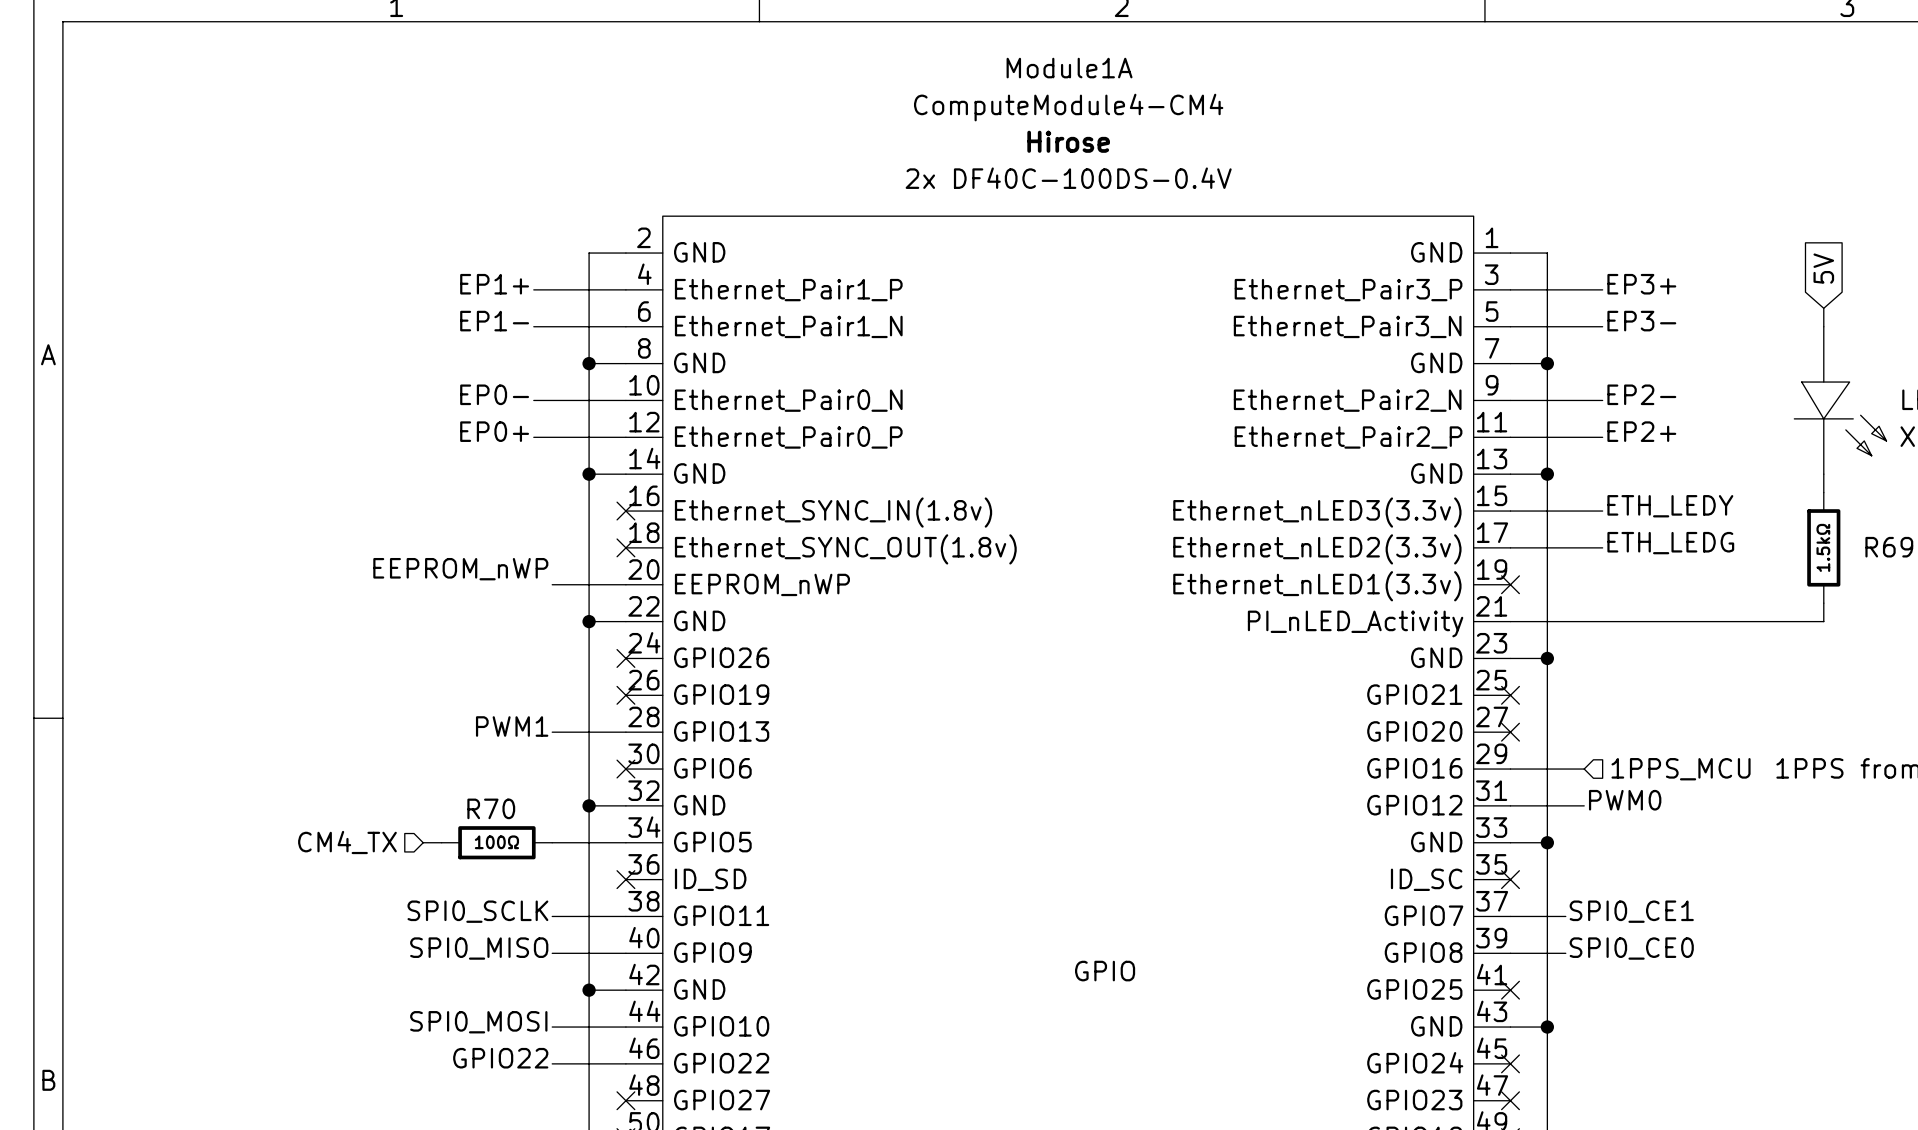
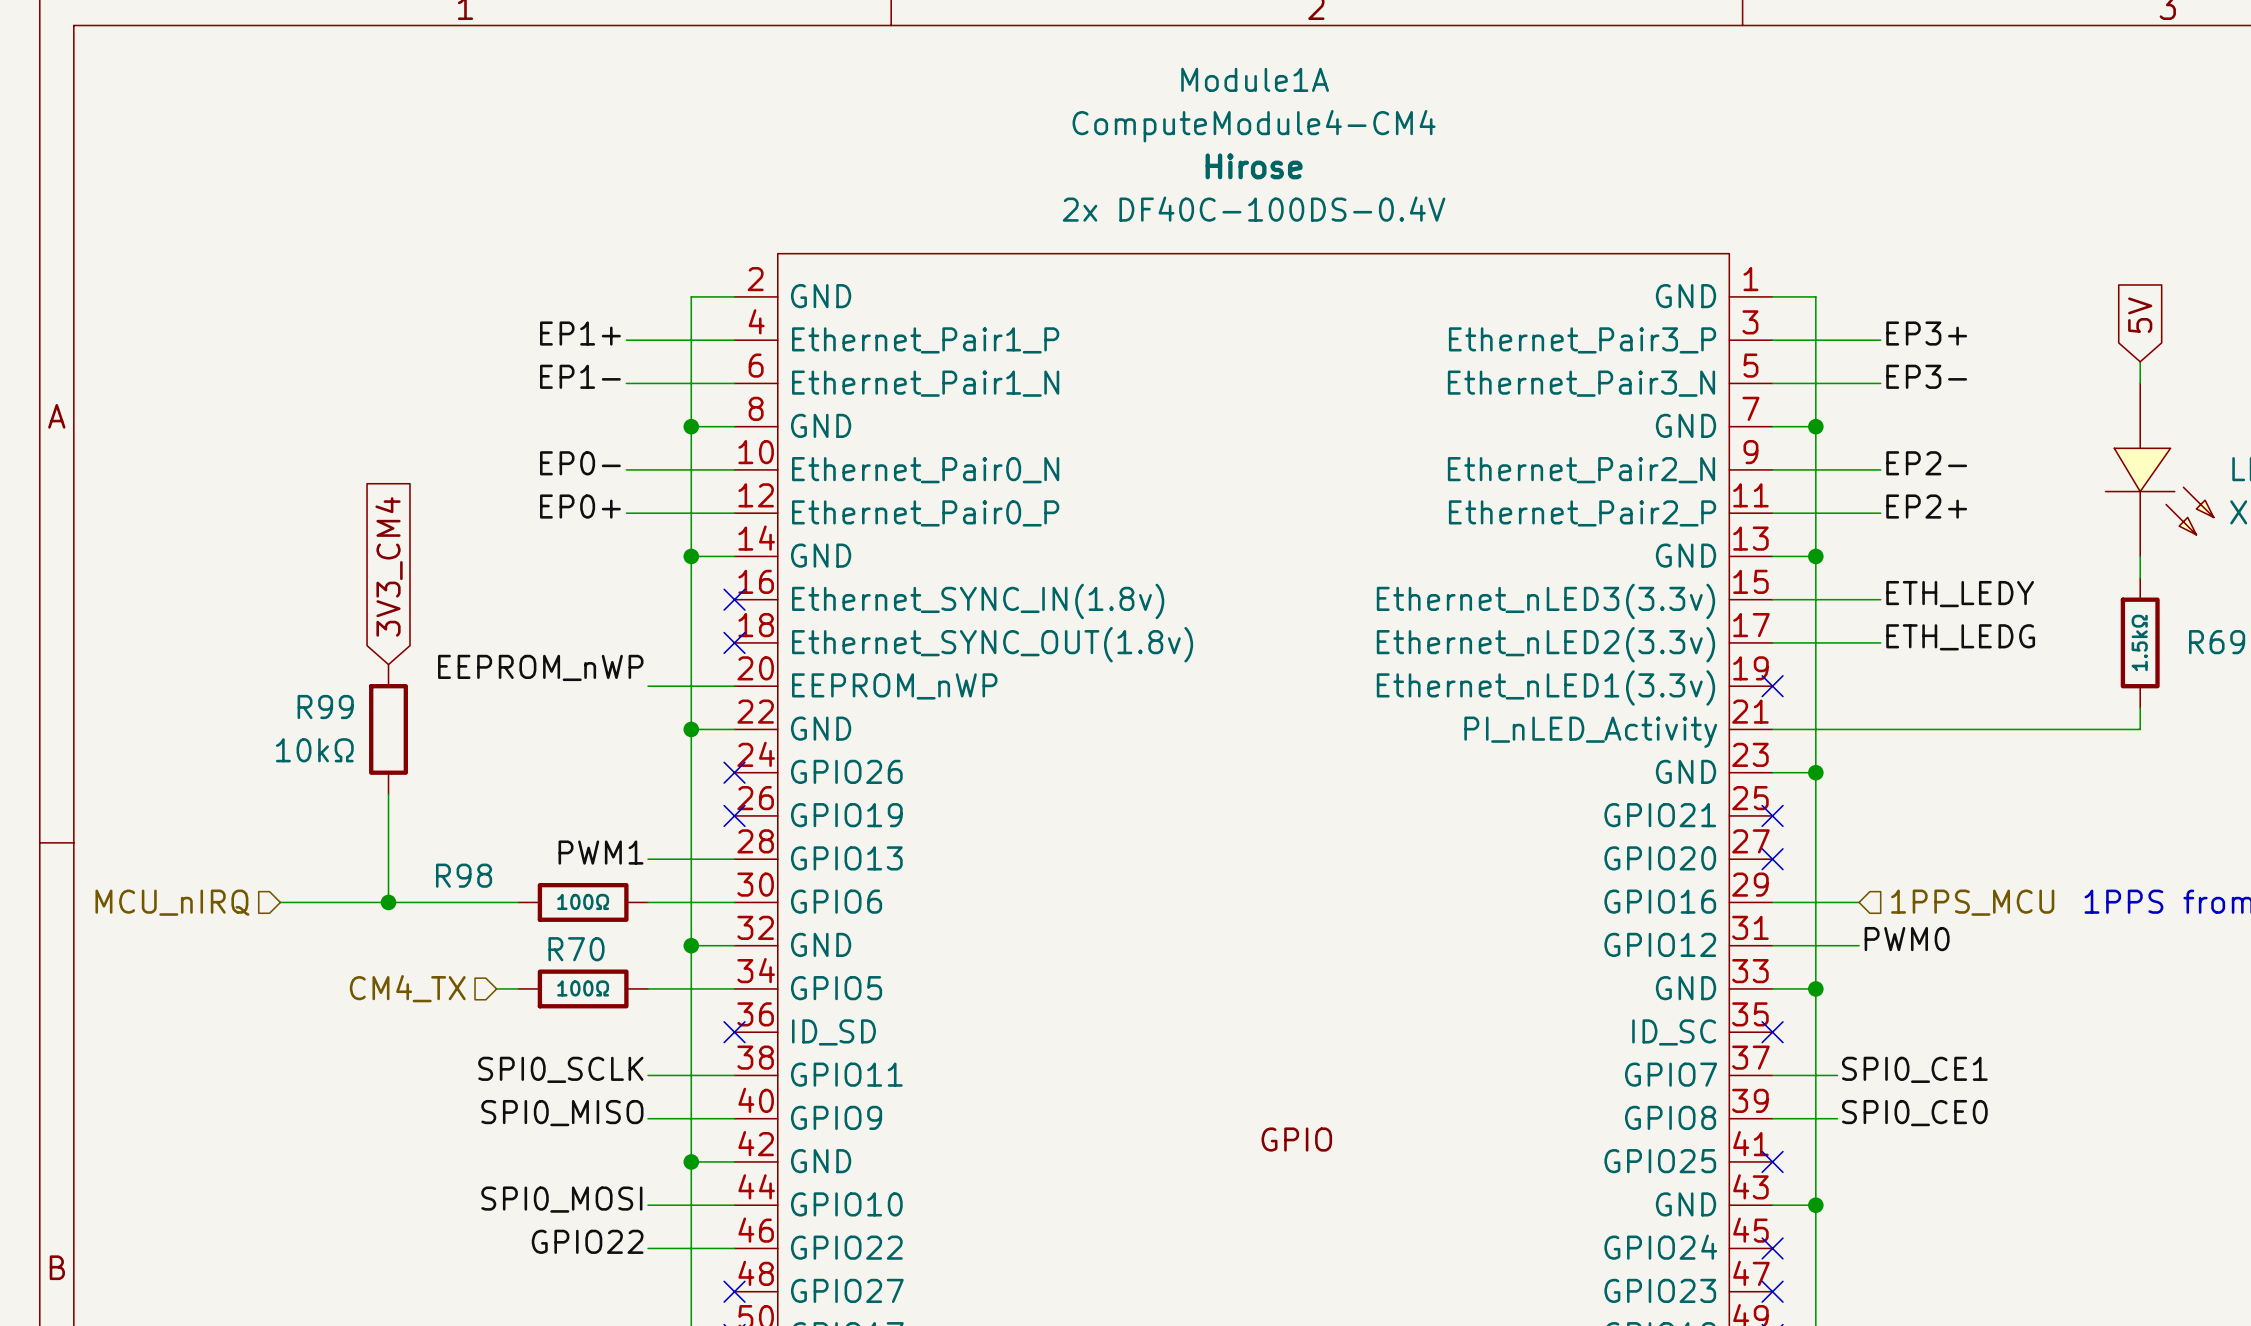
global label: none -> 3V3_CM4 (389, 566)
R99: none -> 10kΩ (388, 729)
wire: none -> (388, 794) (388, 902)
hierarchical label: none -> MCU_nIRQ (172, 902)
wire: none -> (280, 902) (518, 902)
junction: none -> (388, 902)
R98: none -> 100Ω (583, 902)
wire: none -> (648, 902) (734, 902)
no-connect mark: (625, 769) -> none

